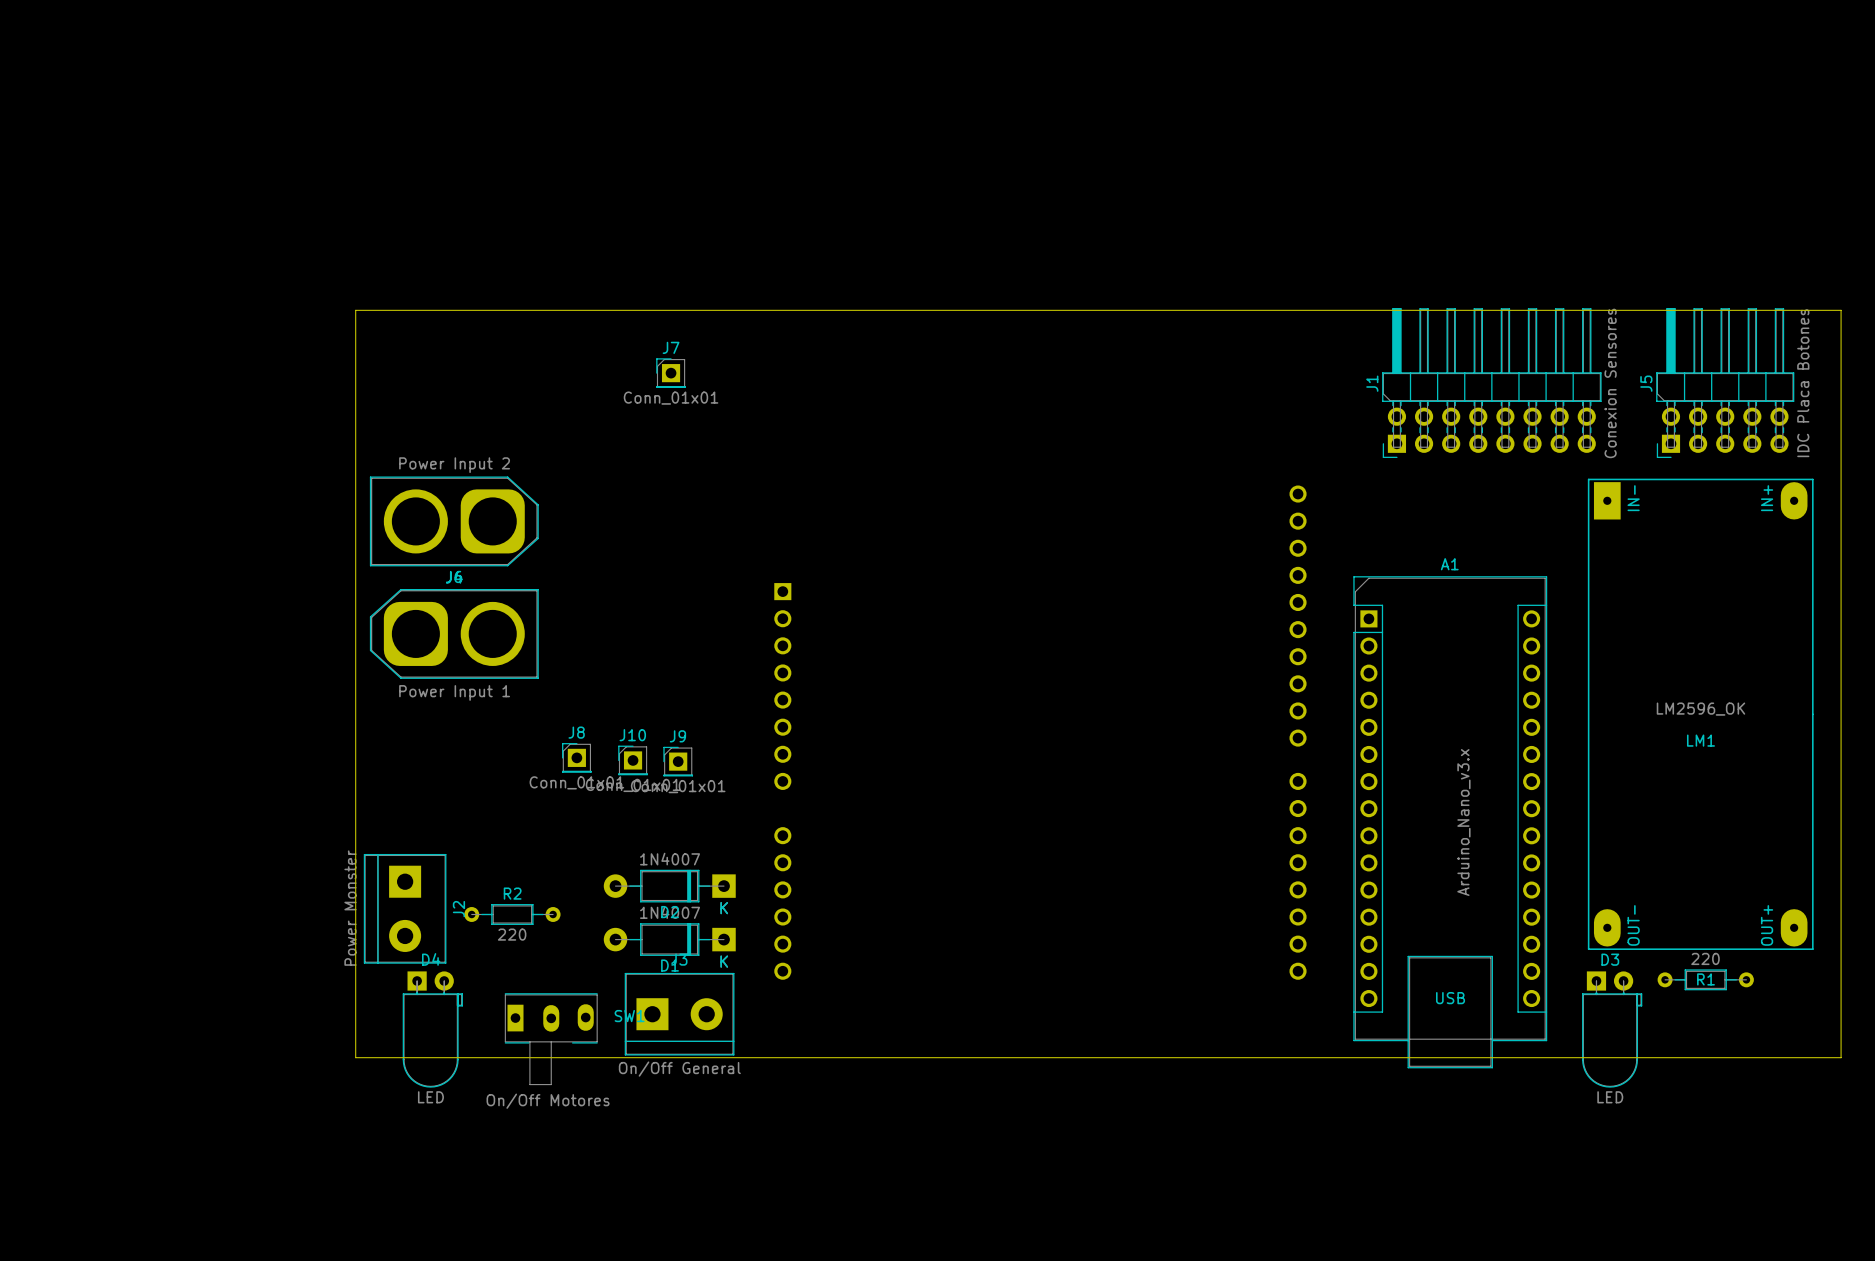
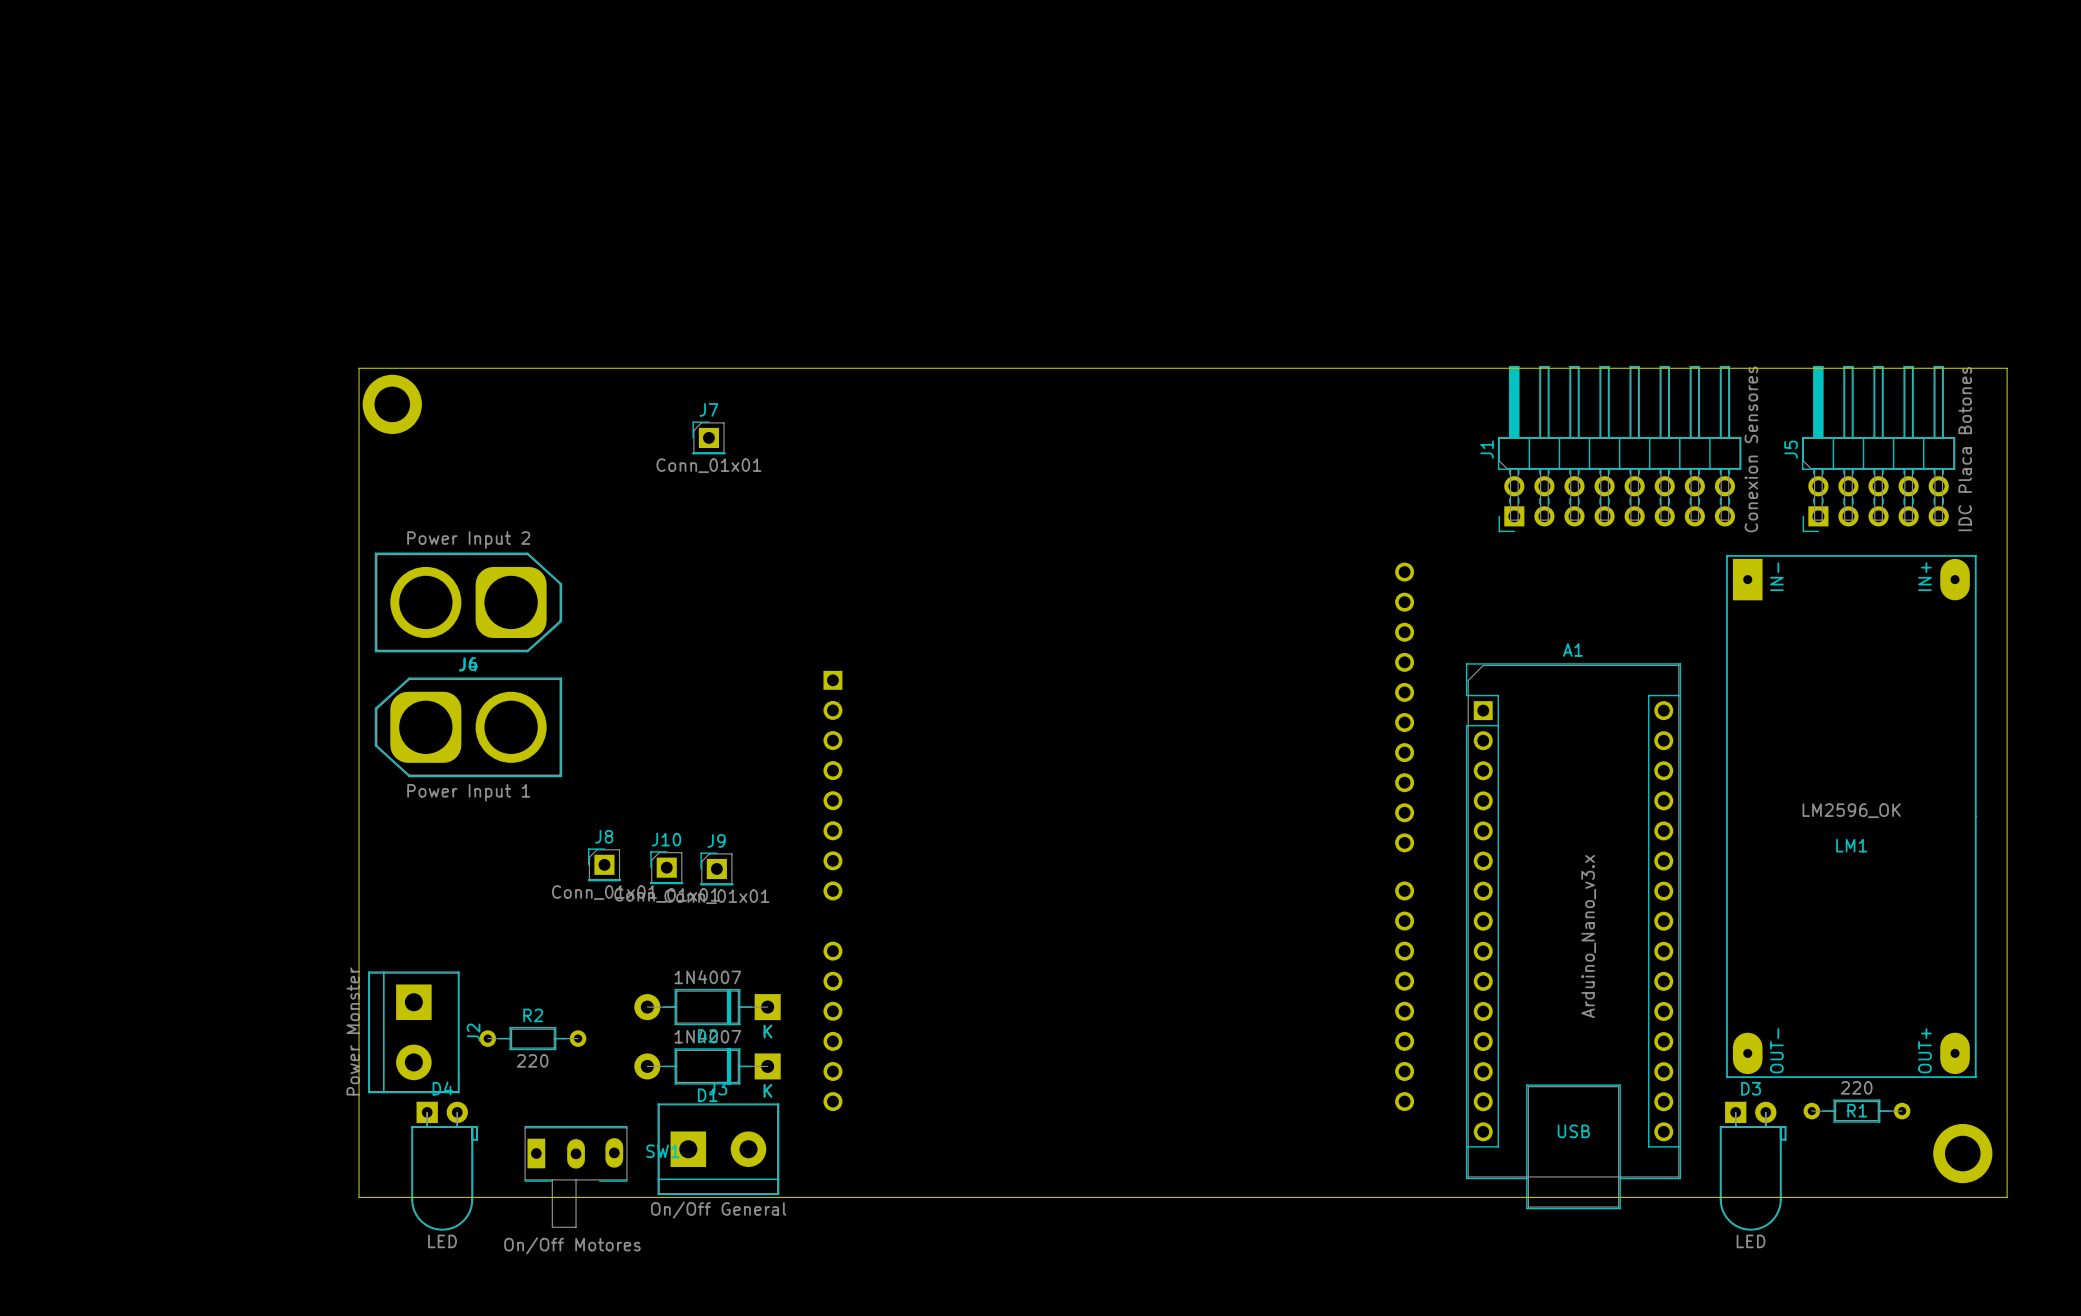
part: none -> (392, 404)
part: none -> (1962, 1153)

